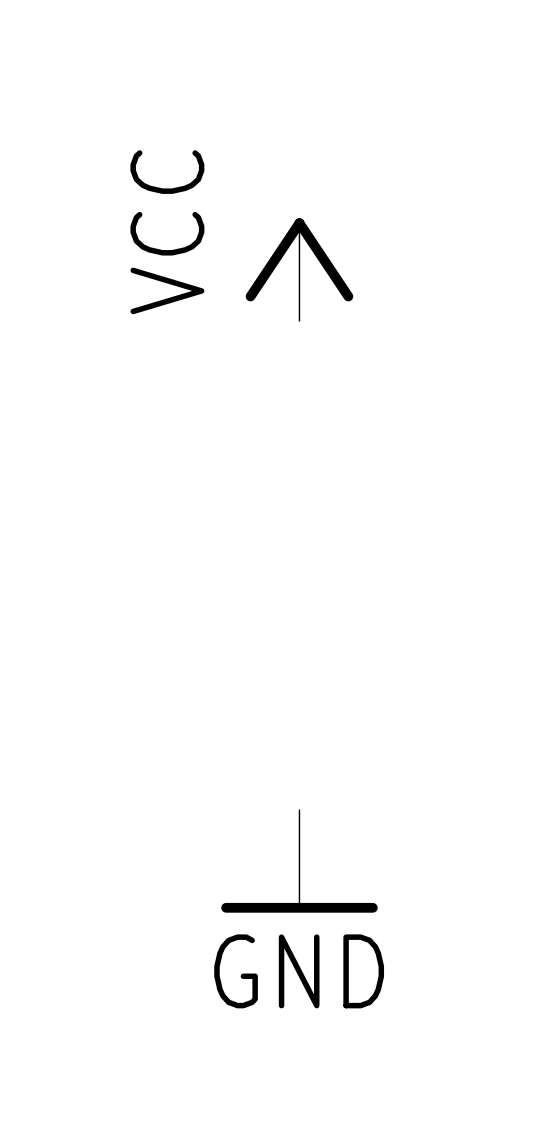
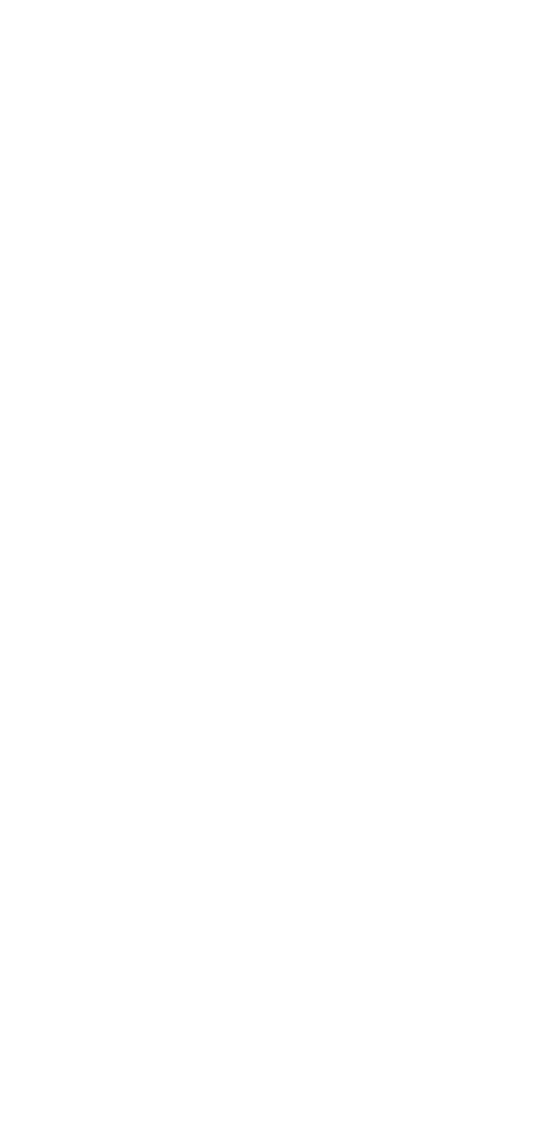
power symbol: VCC (299, 269) -> none
power symbol: GND (299, 861) -> none

